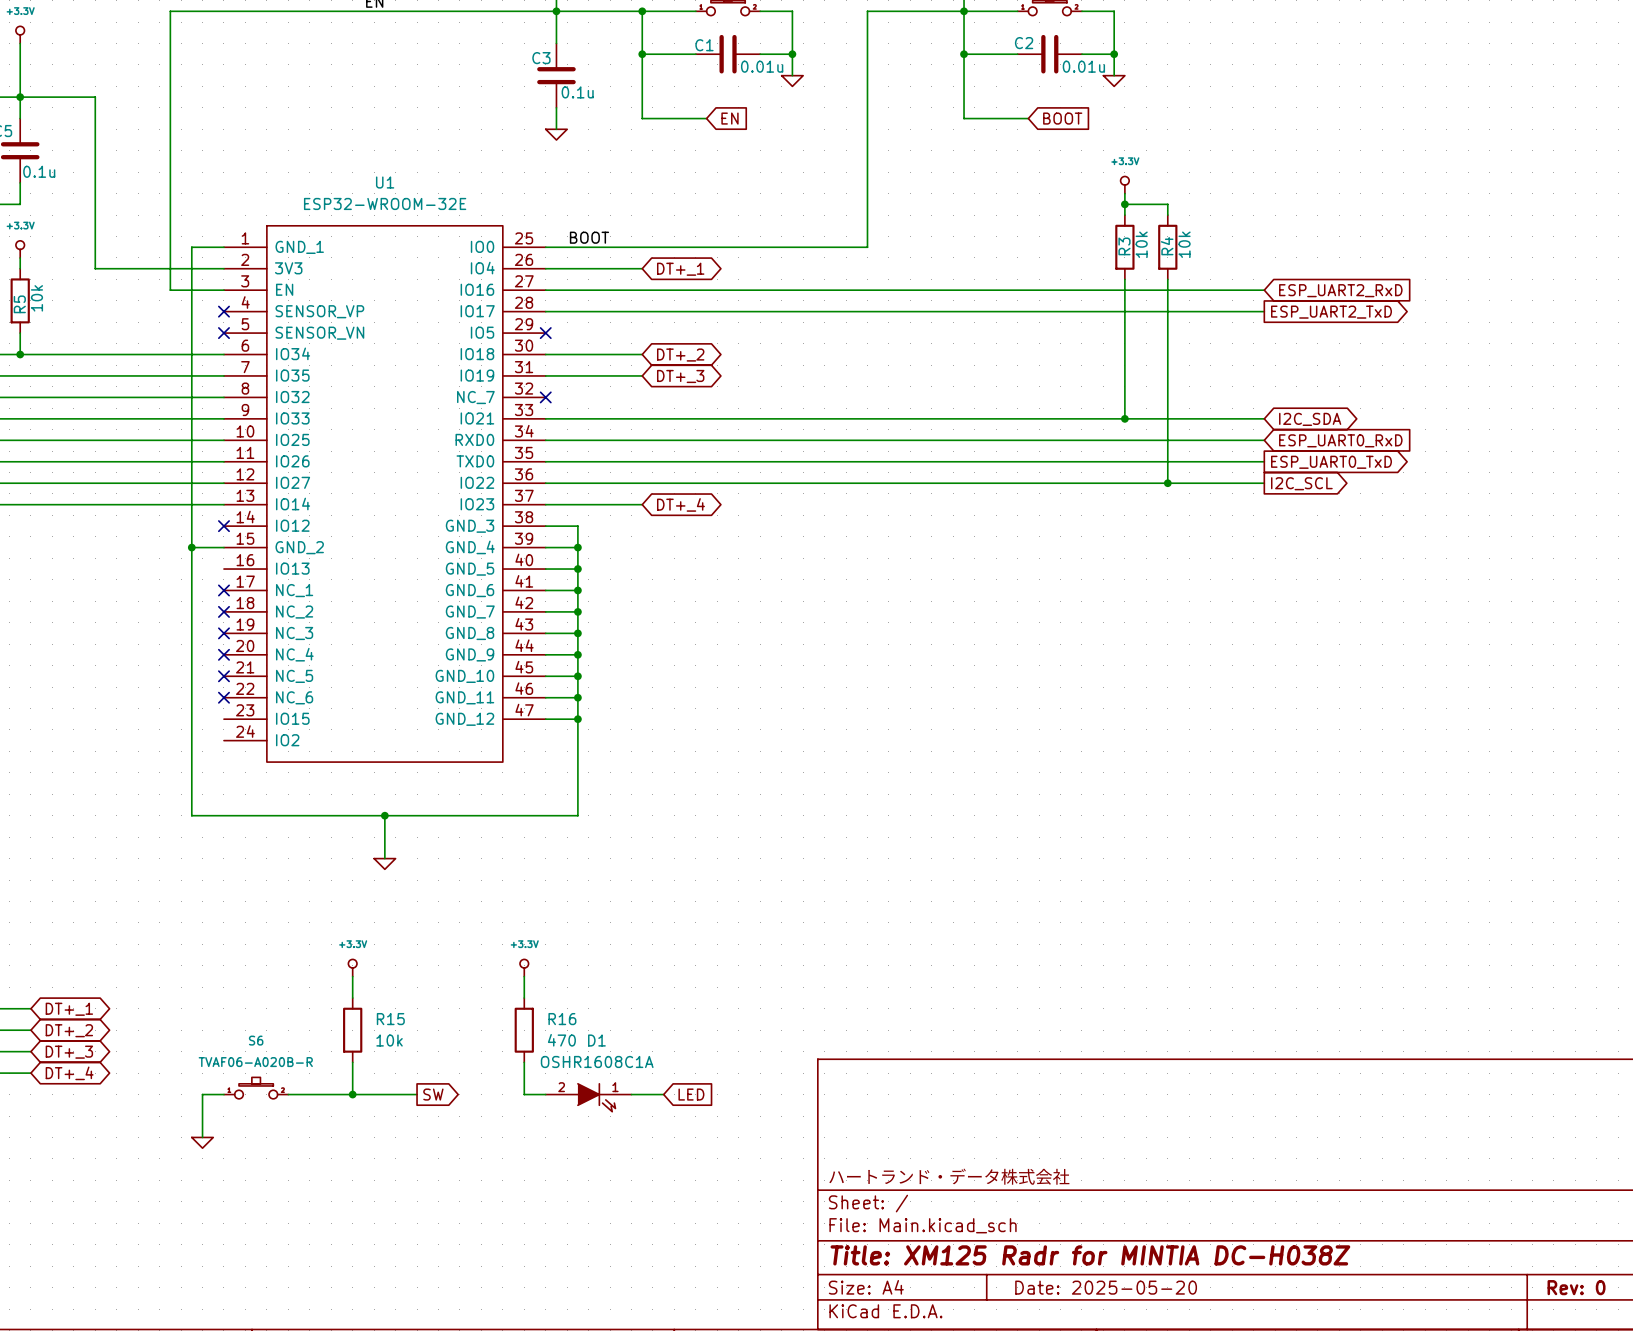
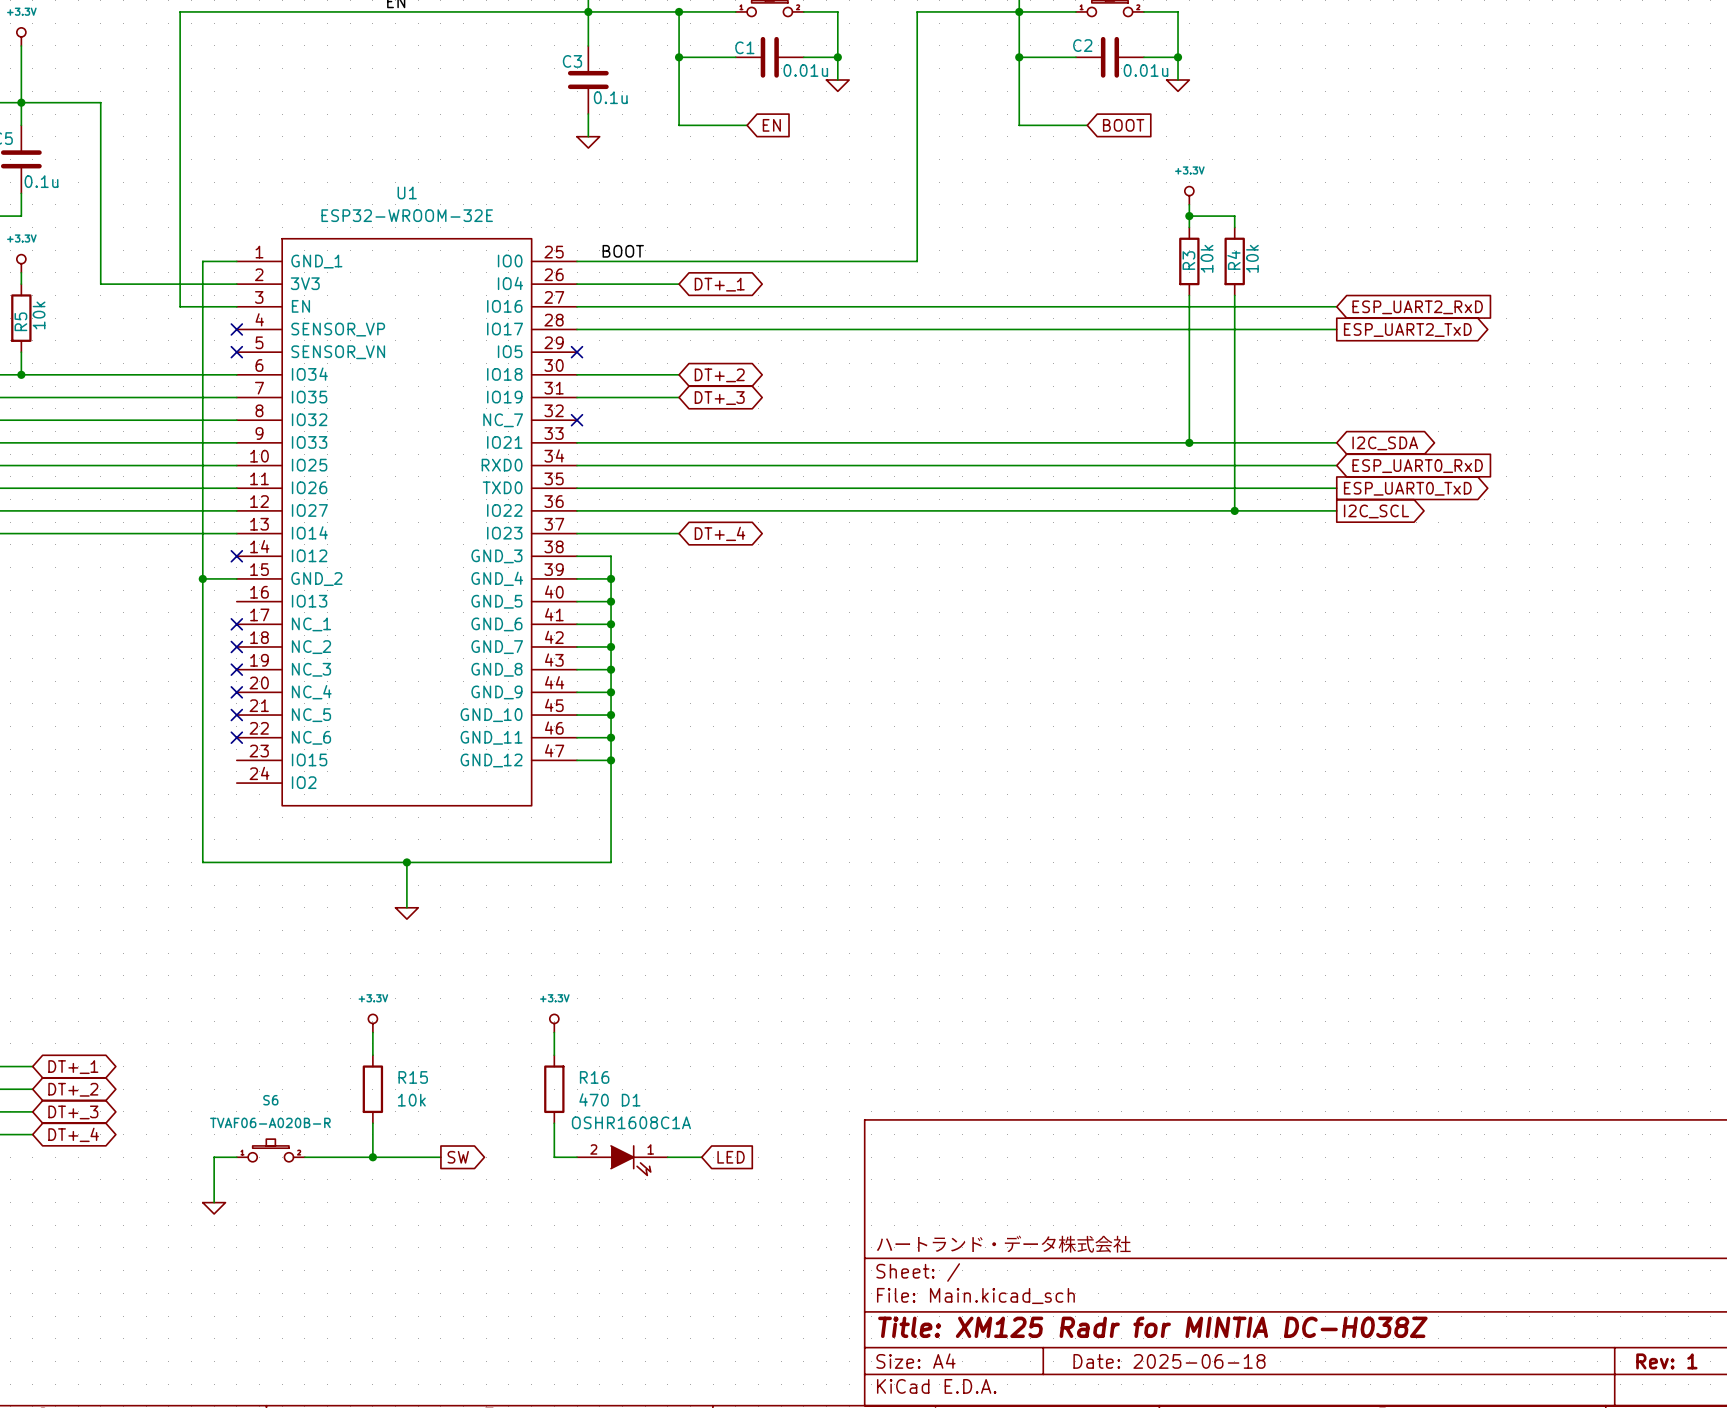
title block: Date: 2025-05-20 (1106, 1287) -> Date: 2025-06-18 (1169, 1361)
title block: Rev: 0 (1576, 1287) -> Rev: 1 (1666, 1361)

